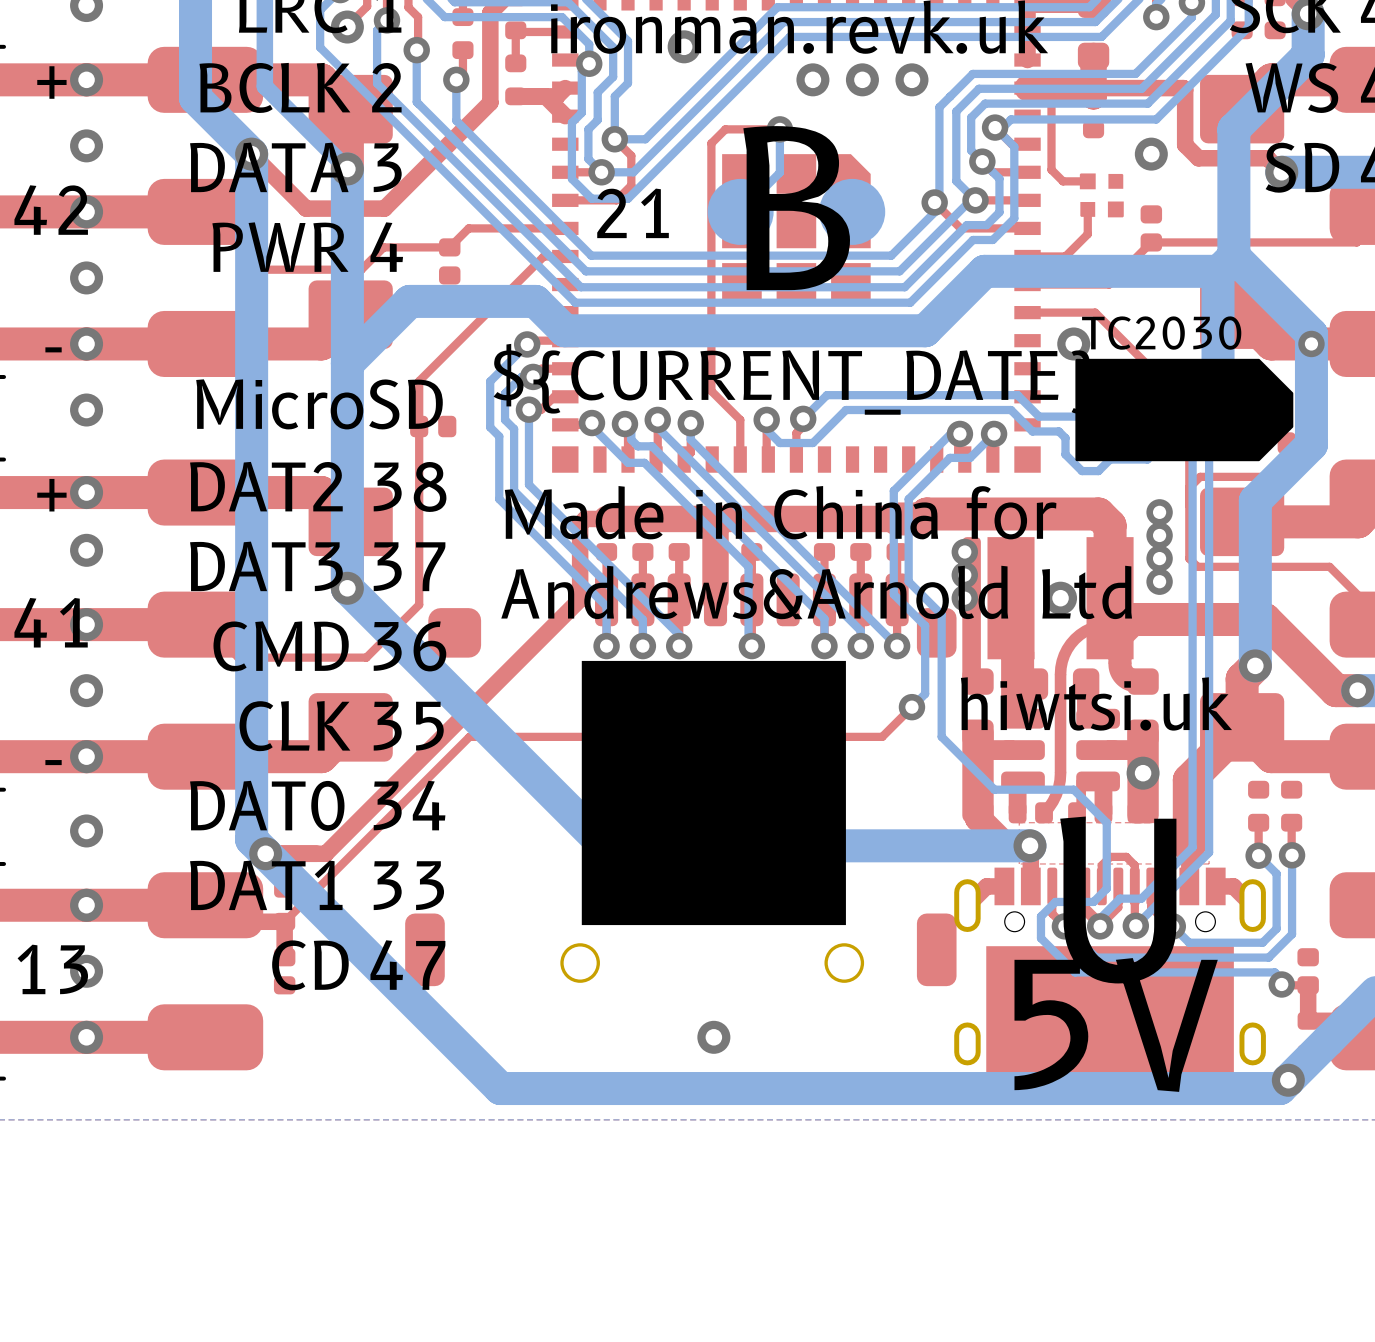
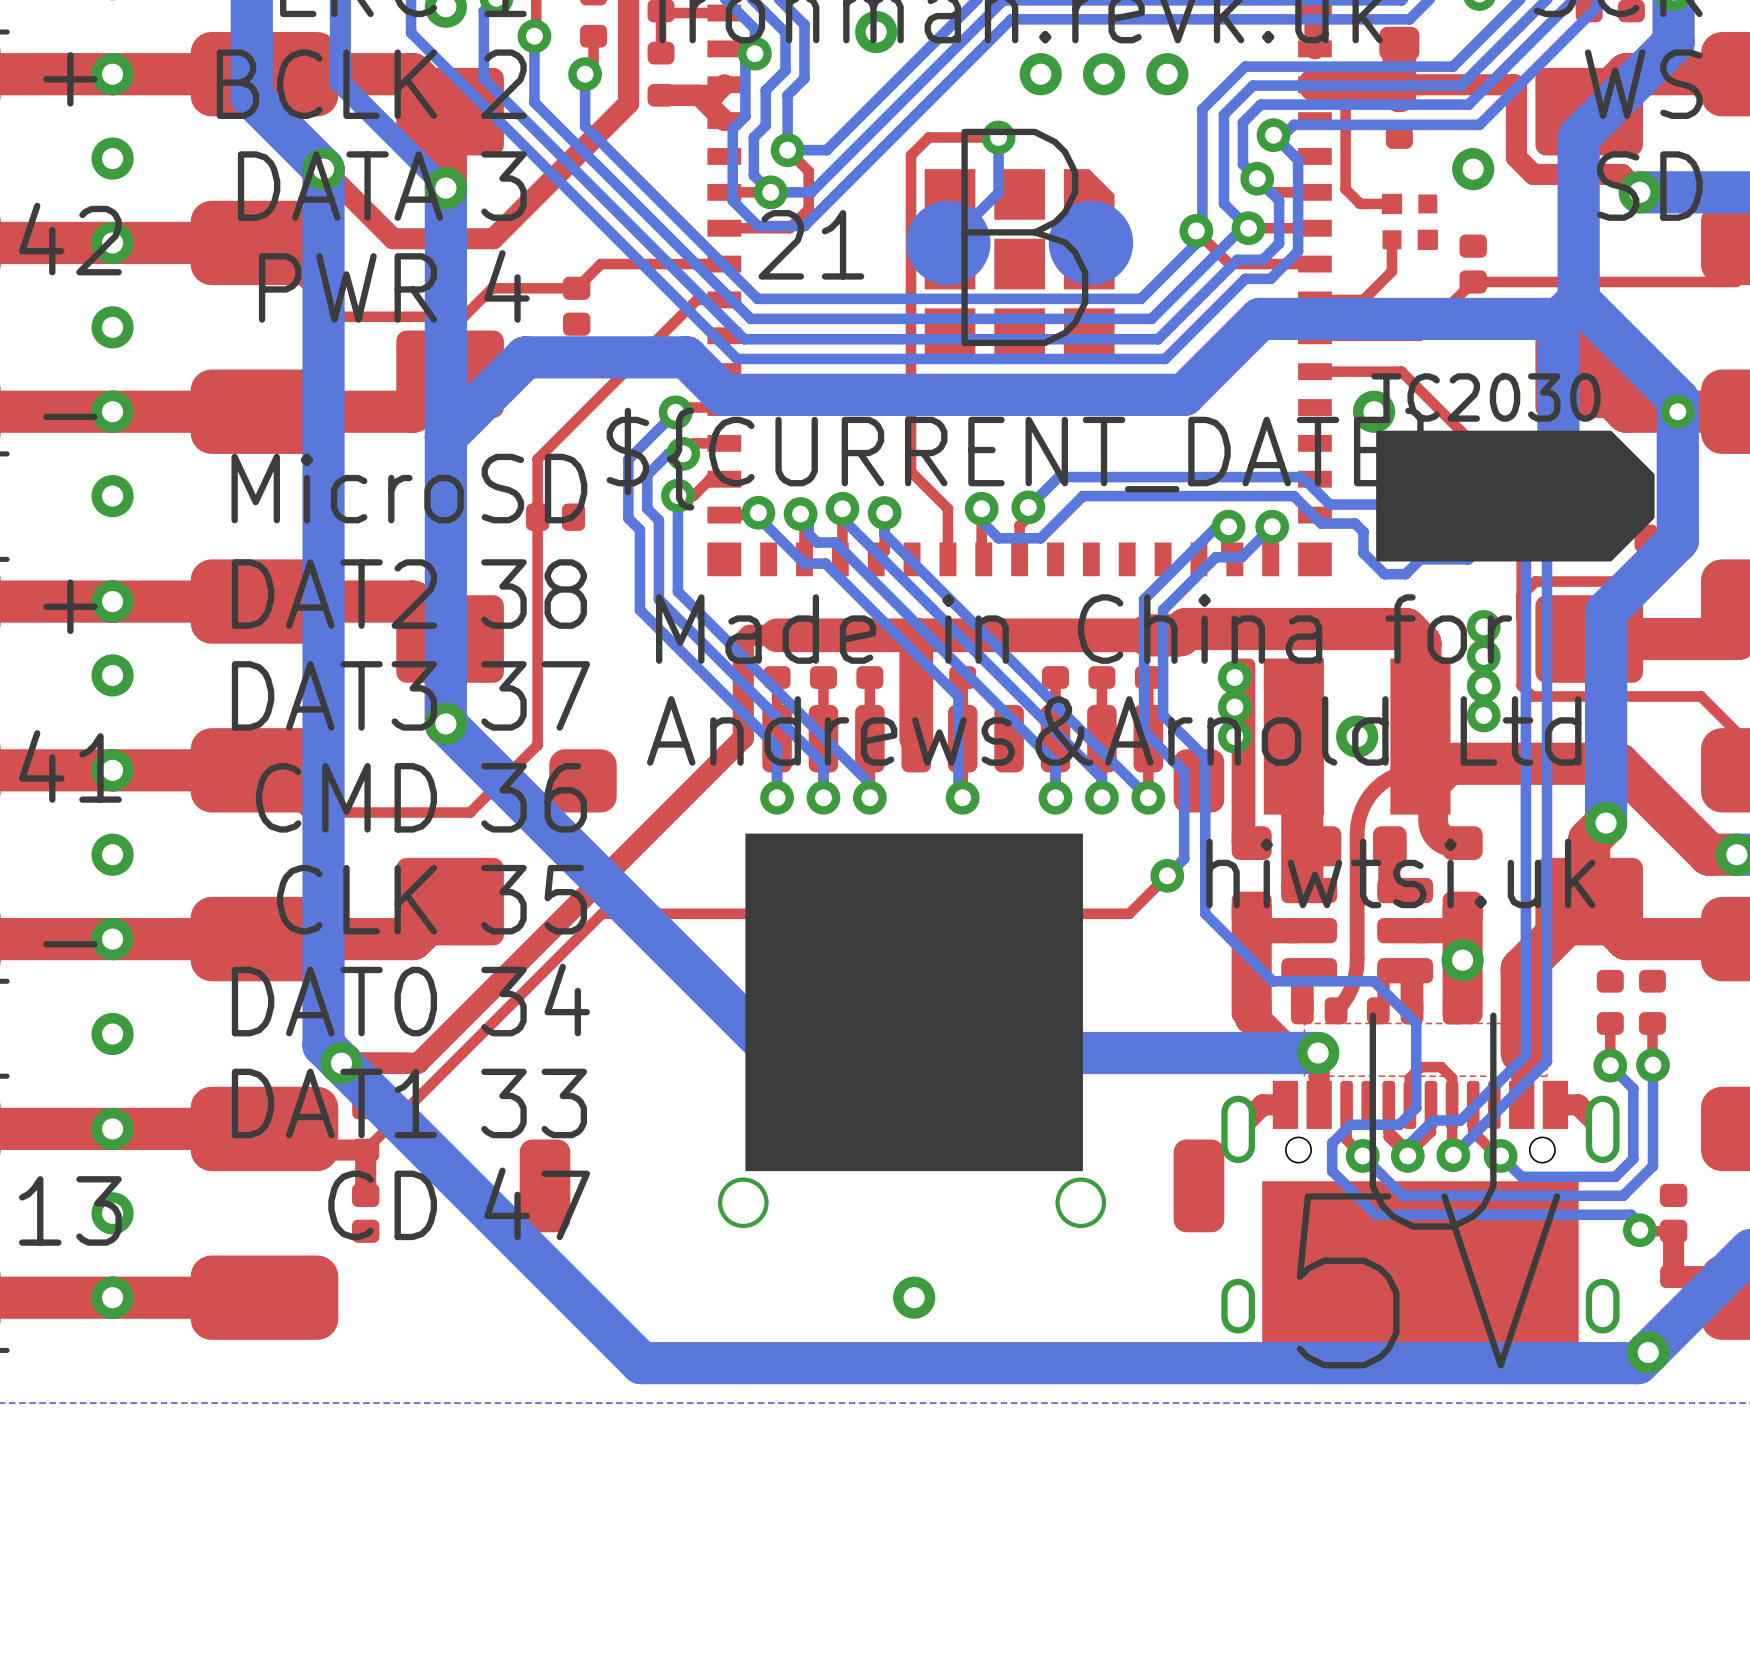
drawing position: (713, 792) -> (914, 1002)

